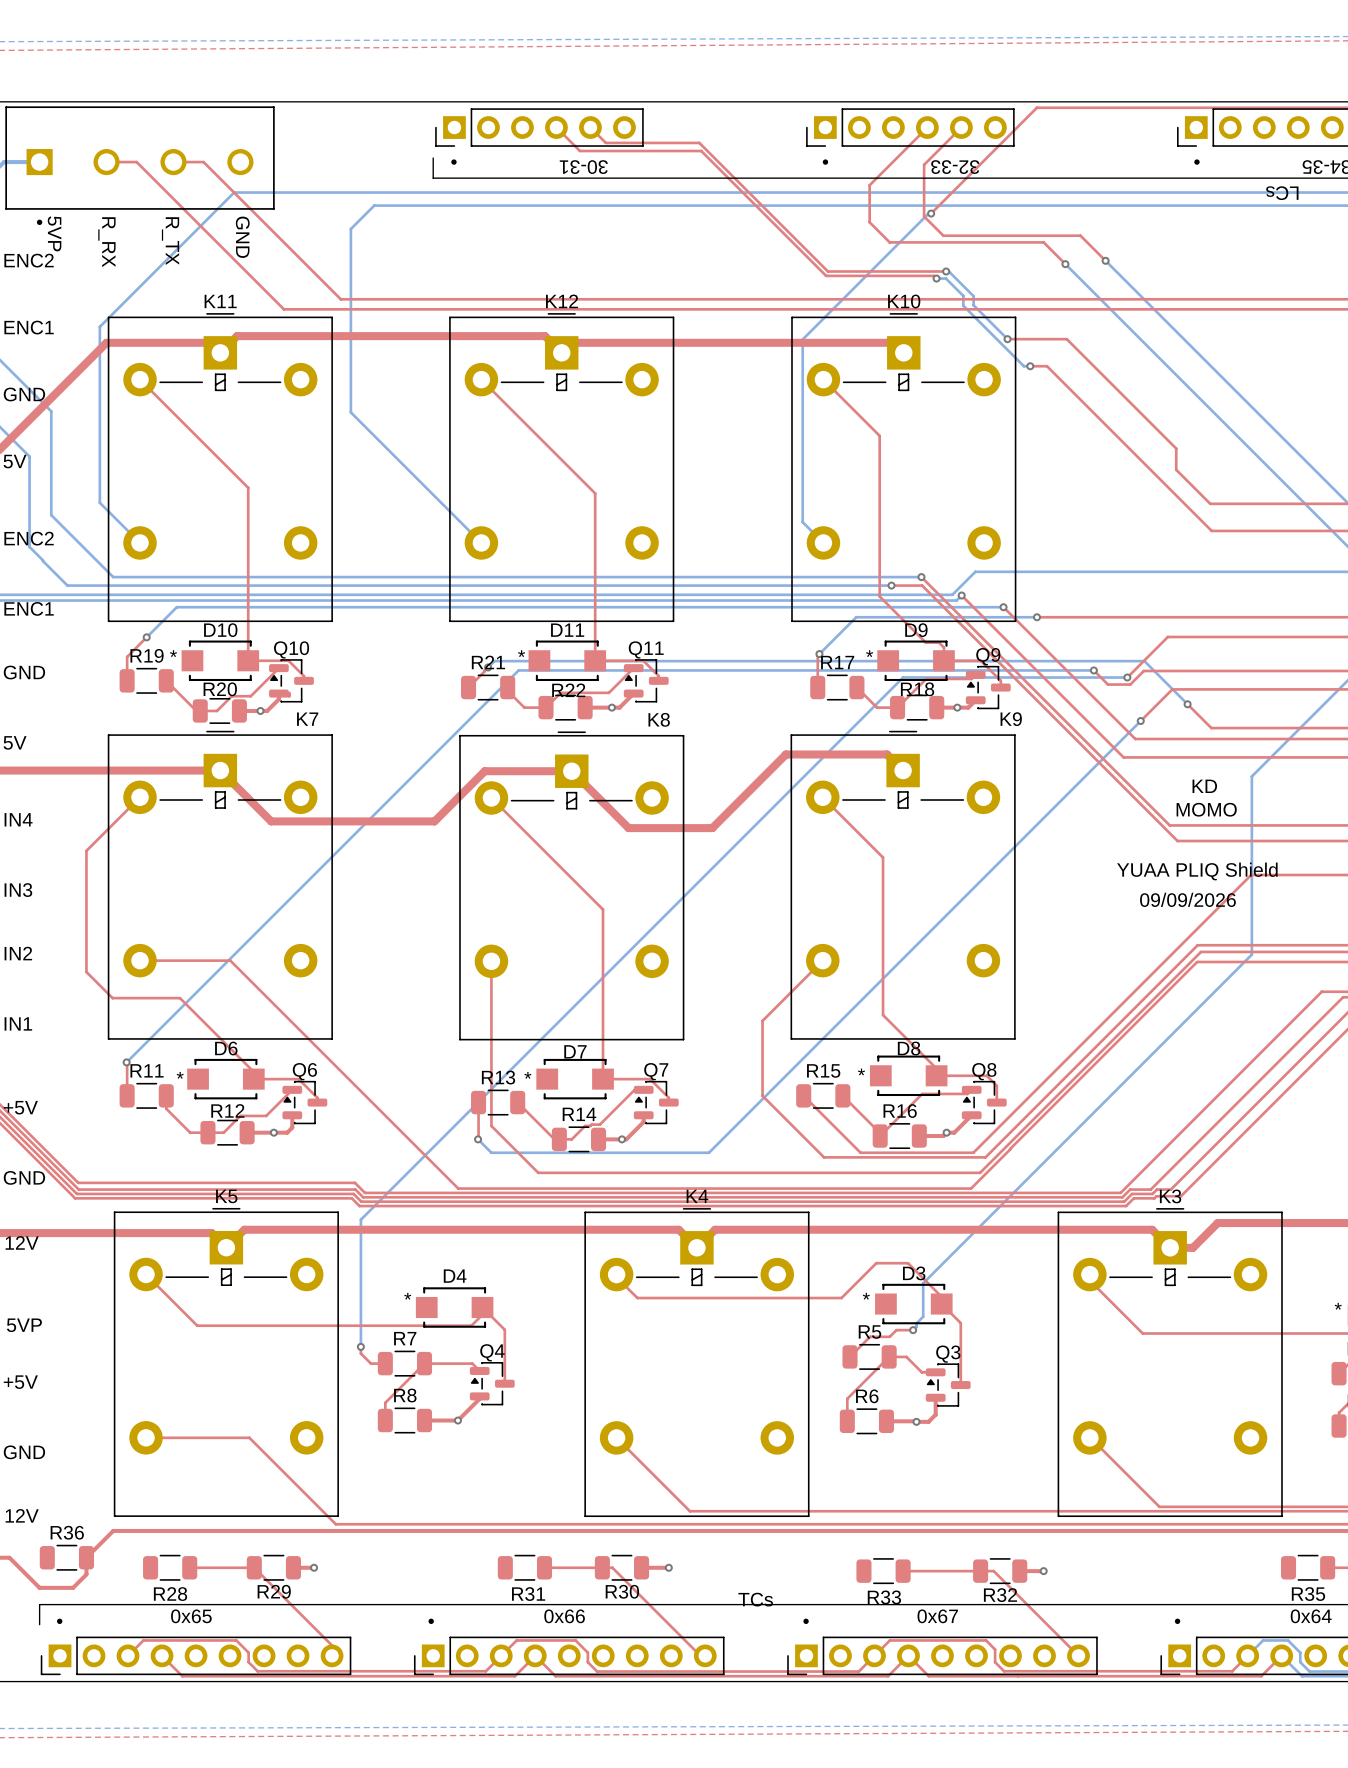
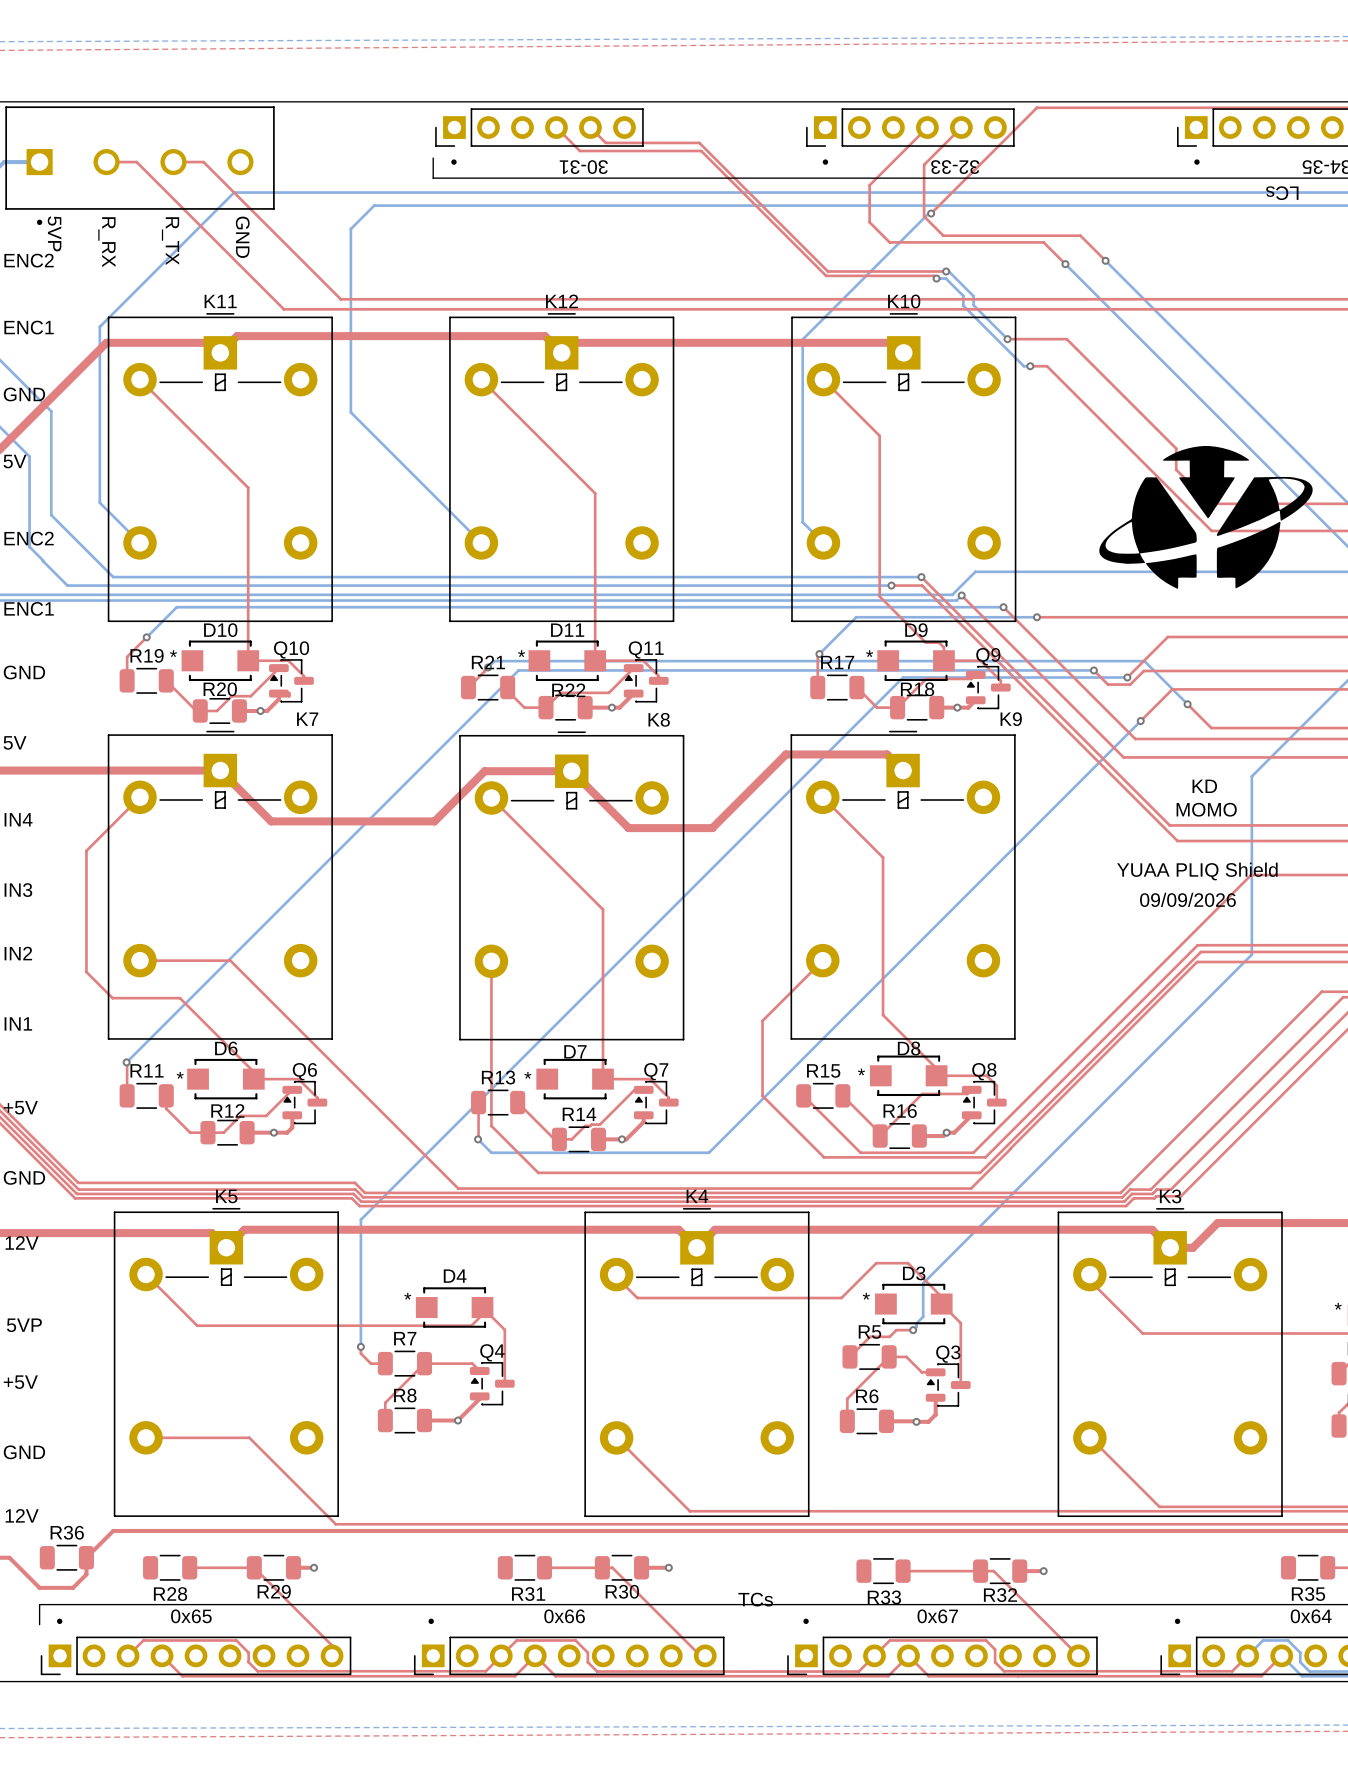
drawing: none -> [1099, 445, 1313, 589]

